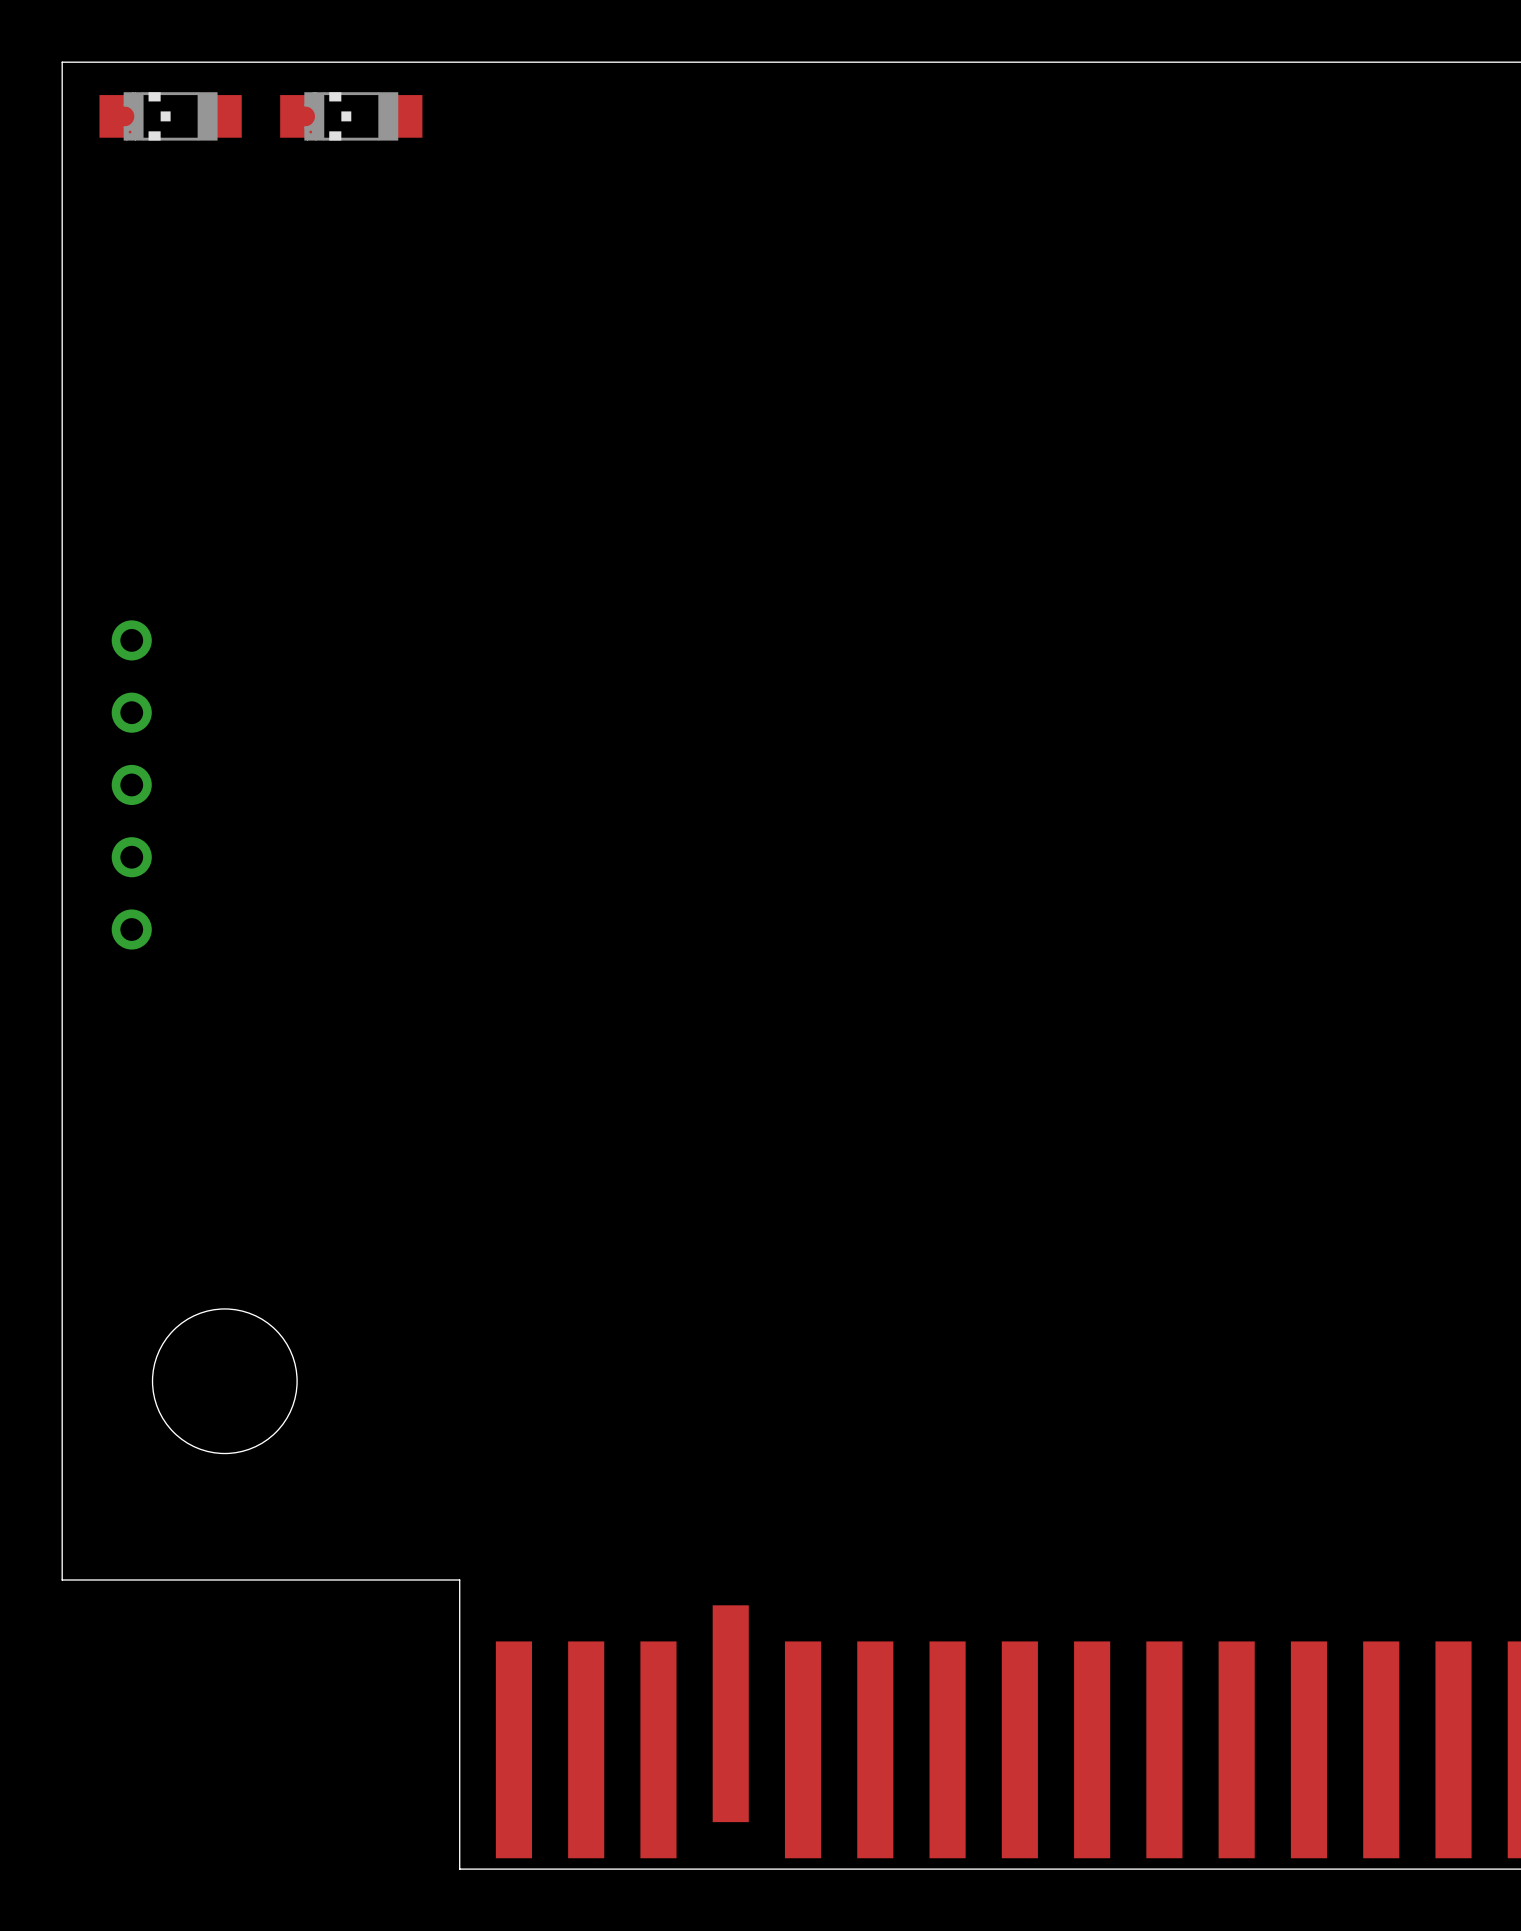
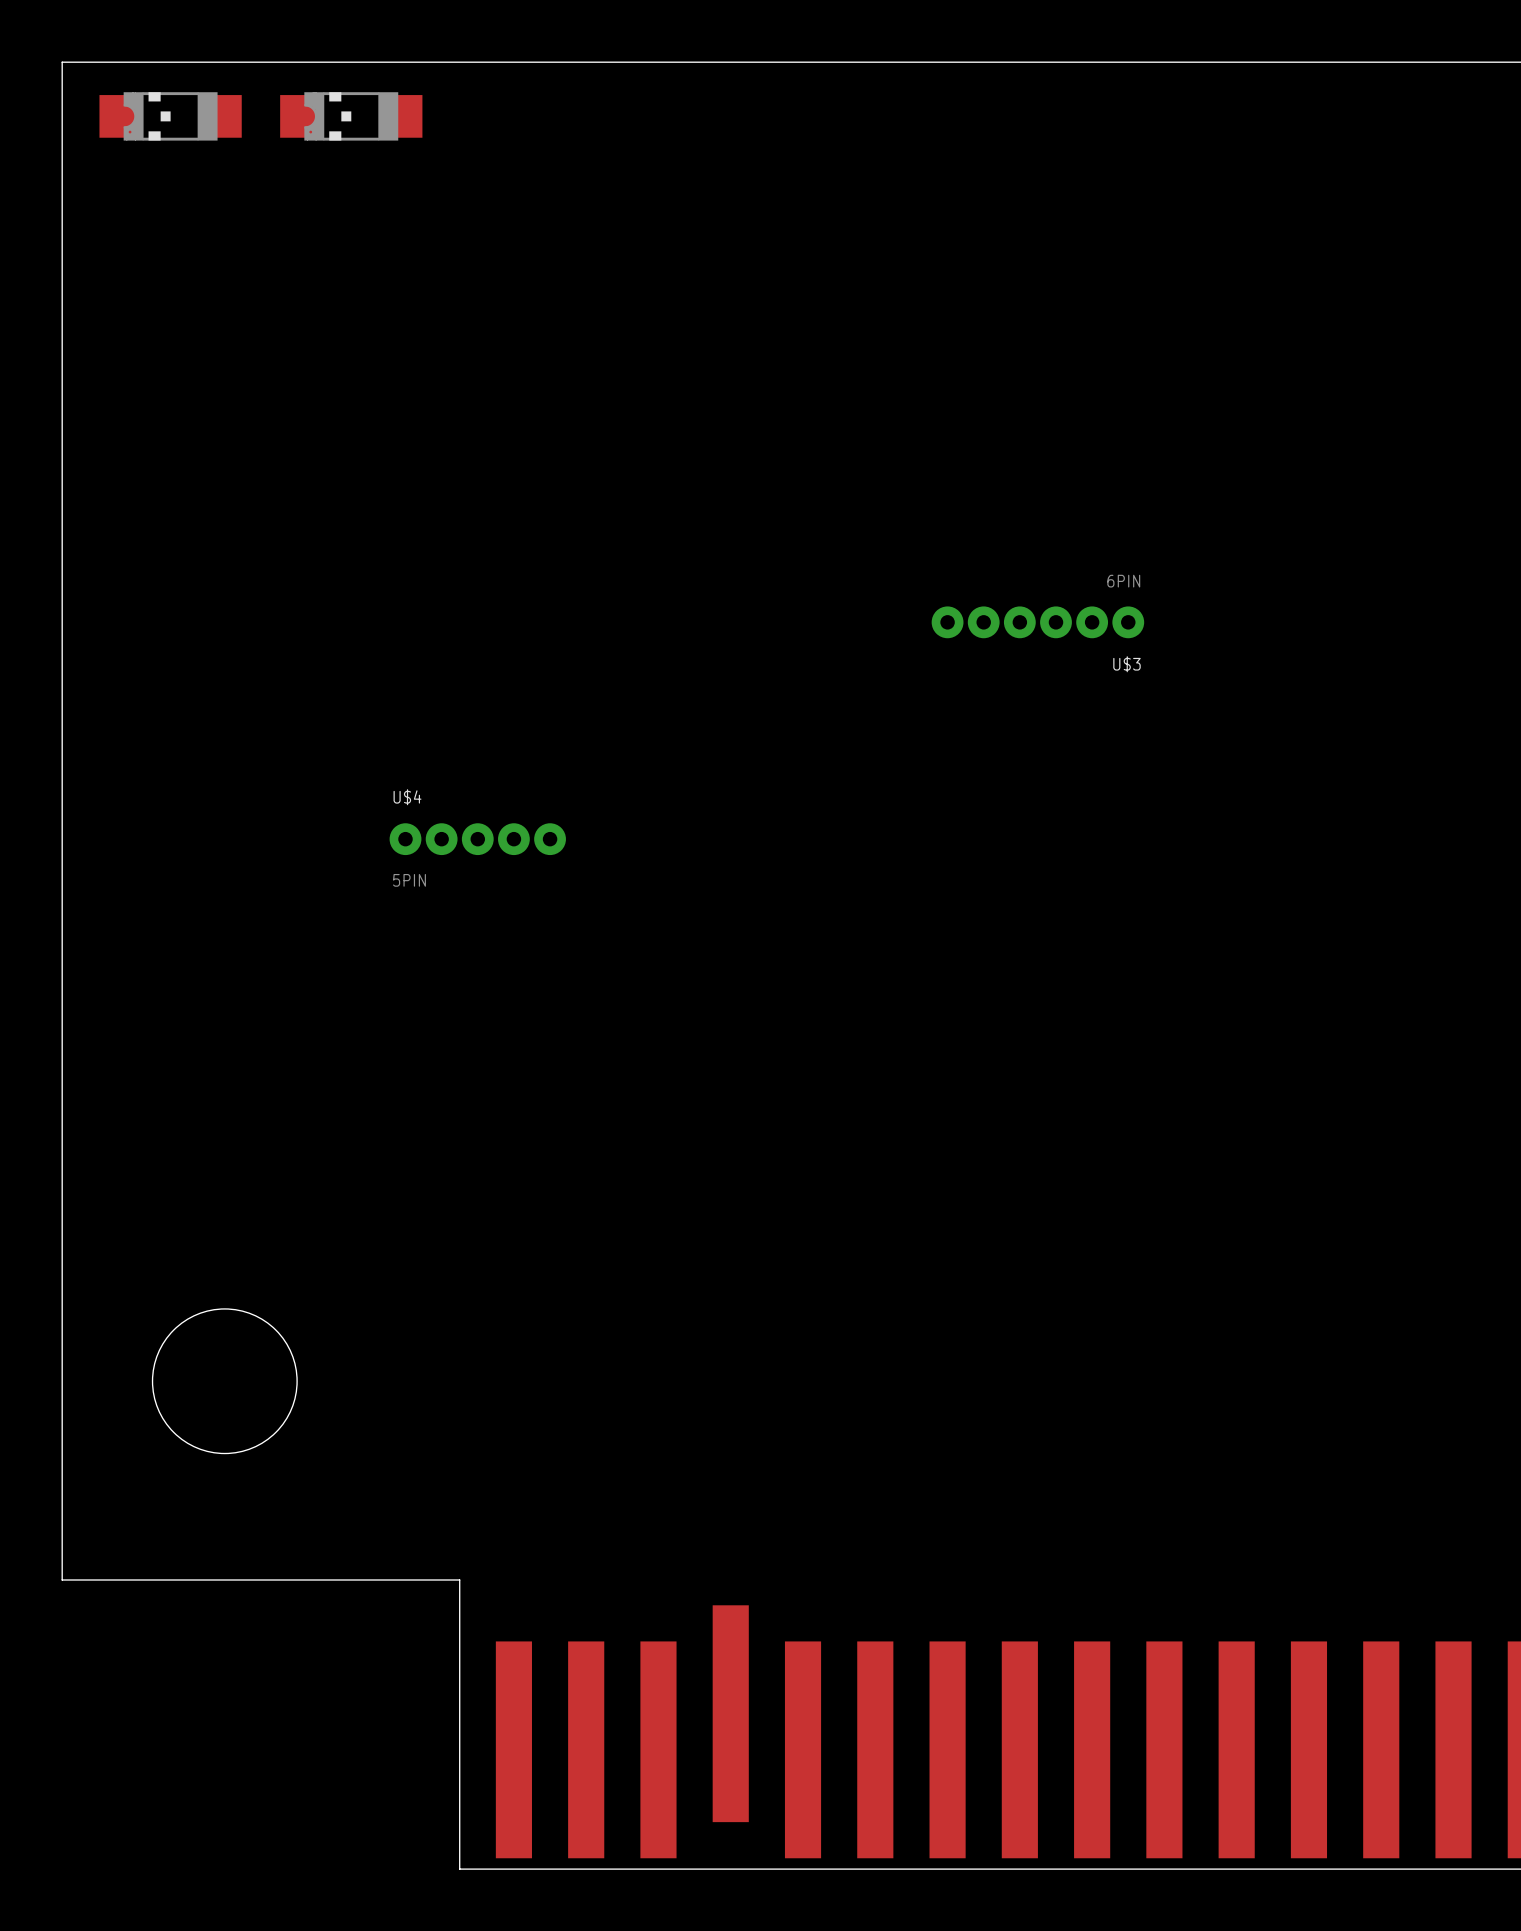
U$3: none -> 6PIN (1037, 622)
part: (131, 784) -> none
U$4: none -> 5PIN (477, 839)

